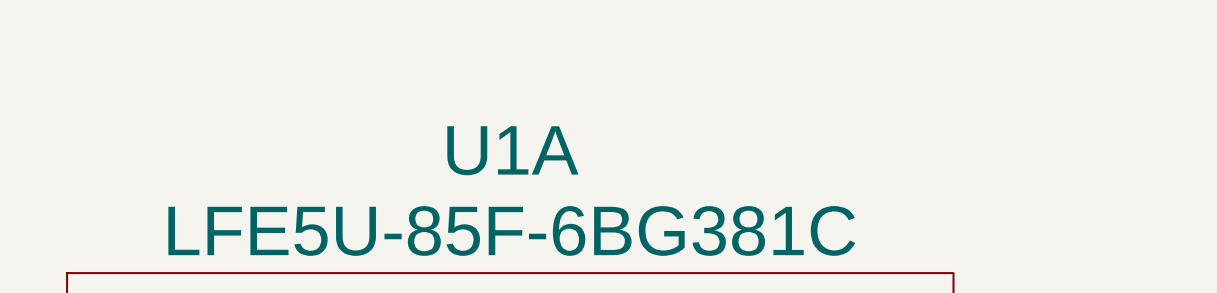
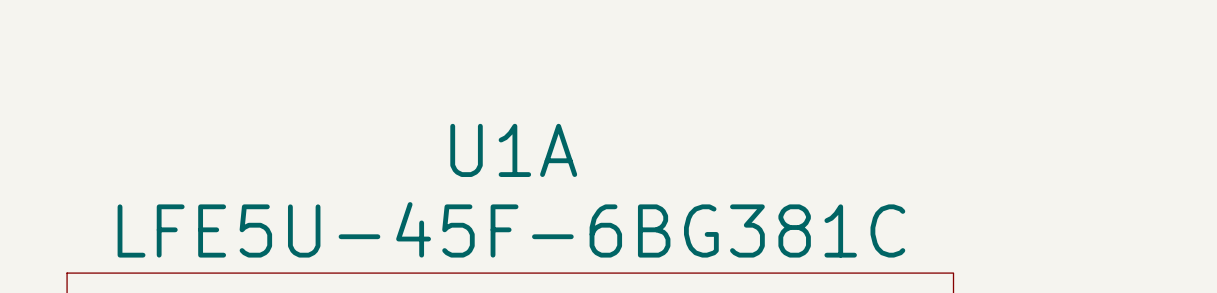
U1A value: LFE5U-85F-6BG381C (511, 230) -> LFE5U-45F-6BG381C (511, 229)

